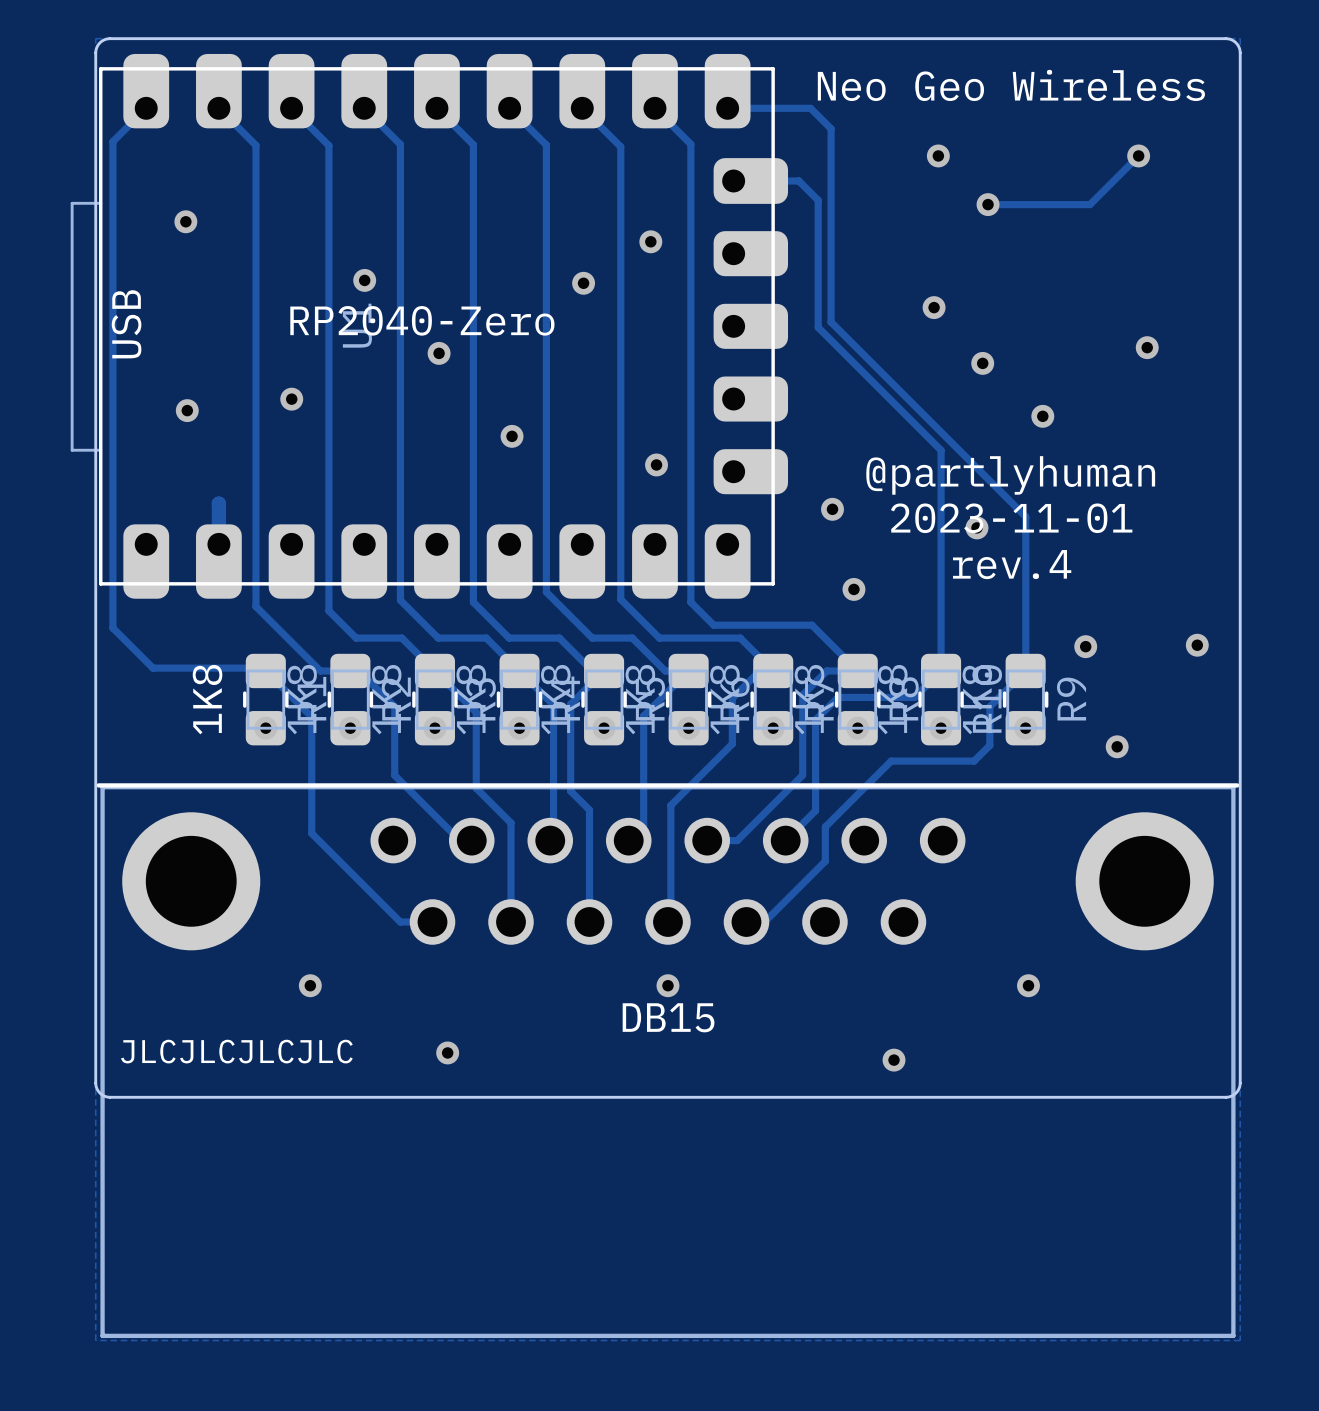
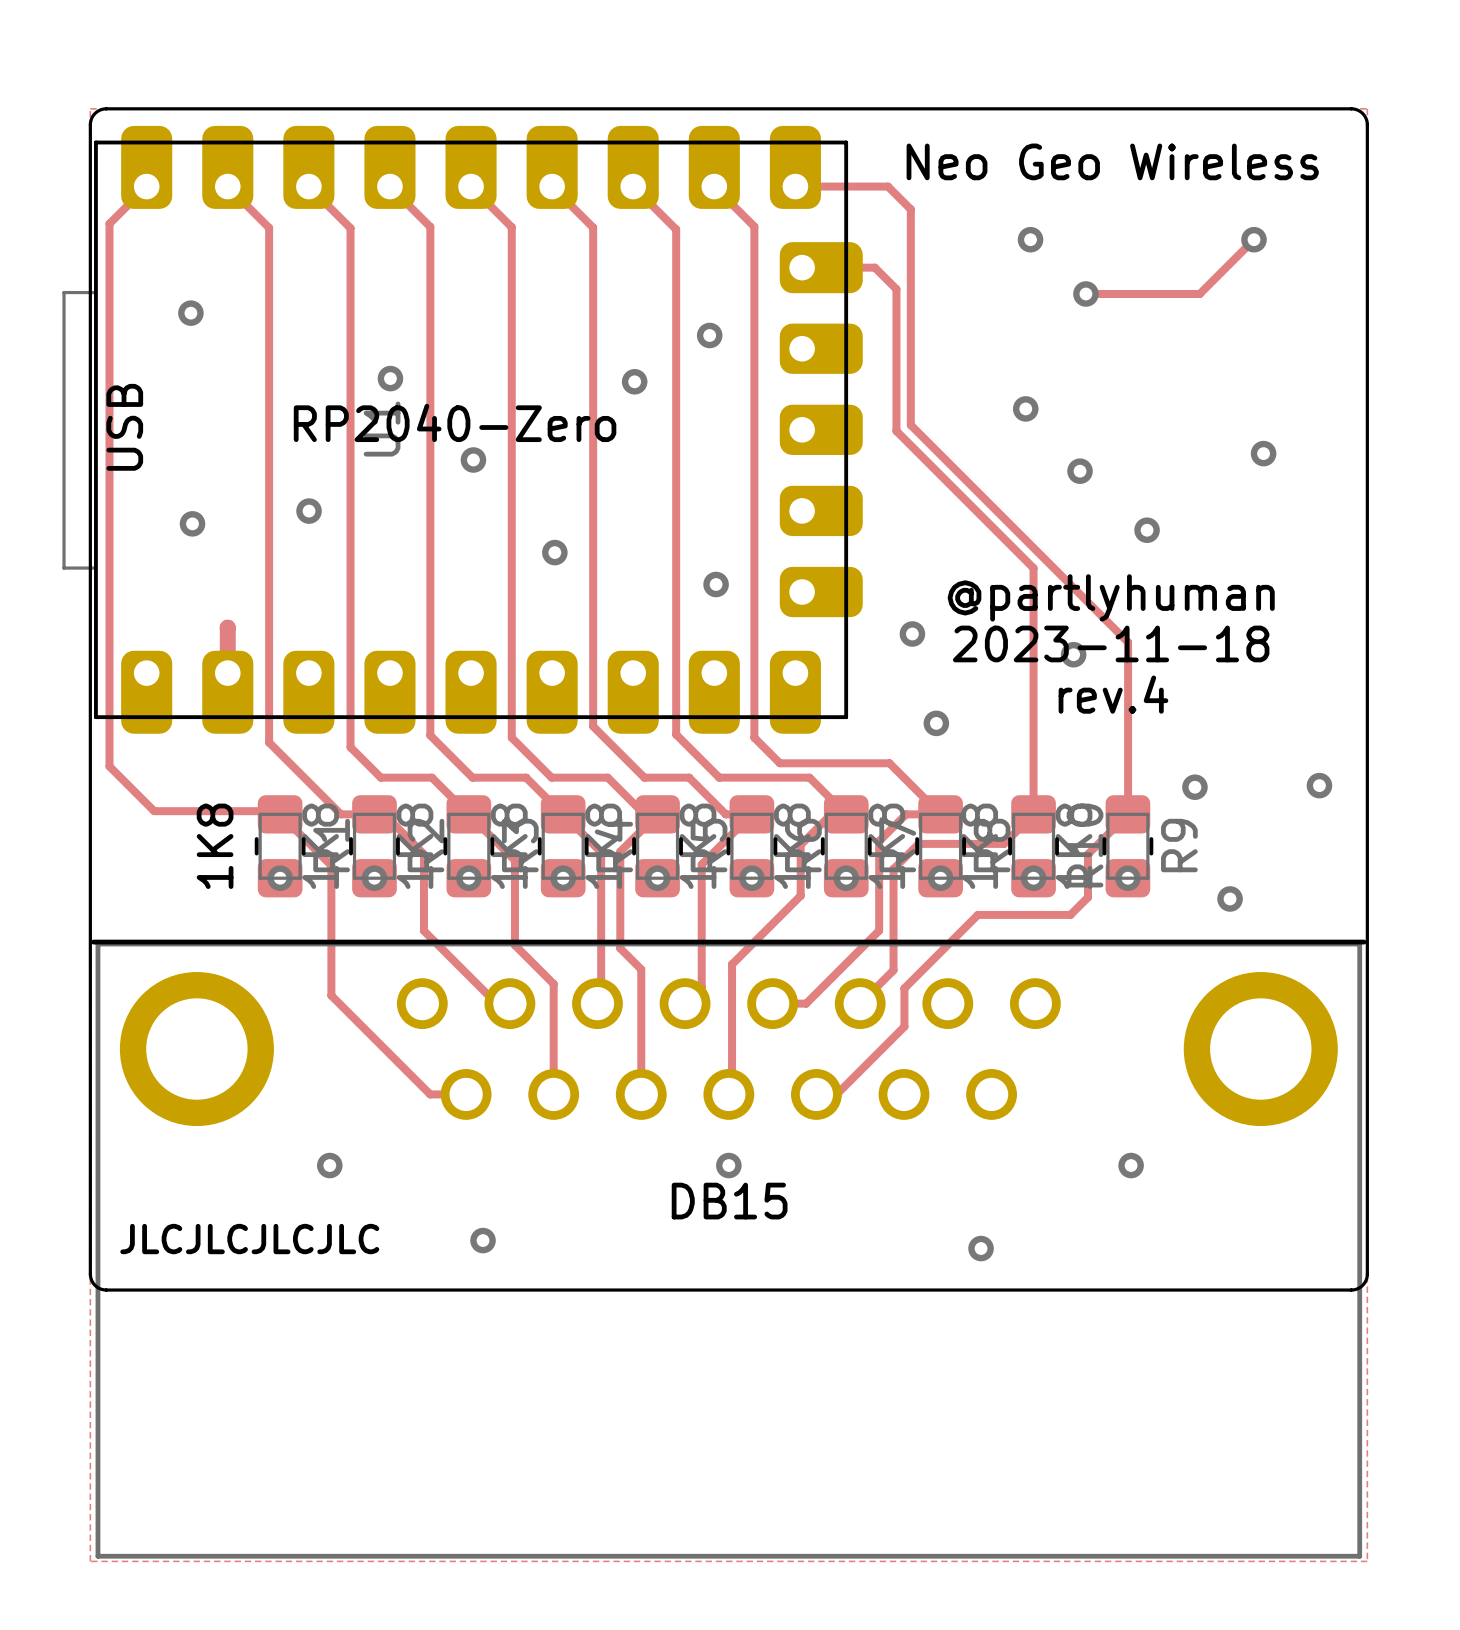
text: 2023-11-01 (1011, 518) -> 2023-11-18 (1111, 643)

